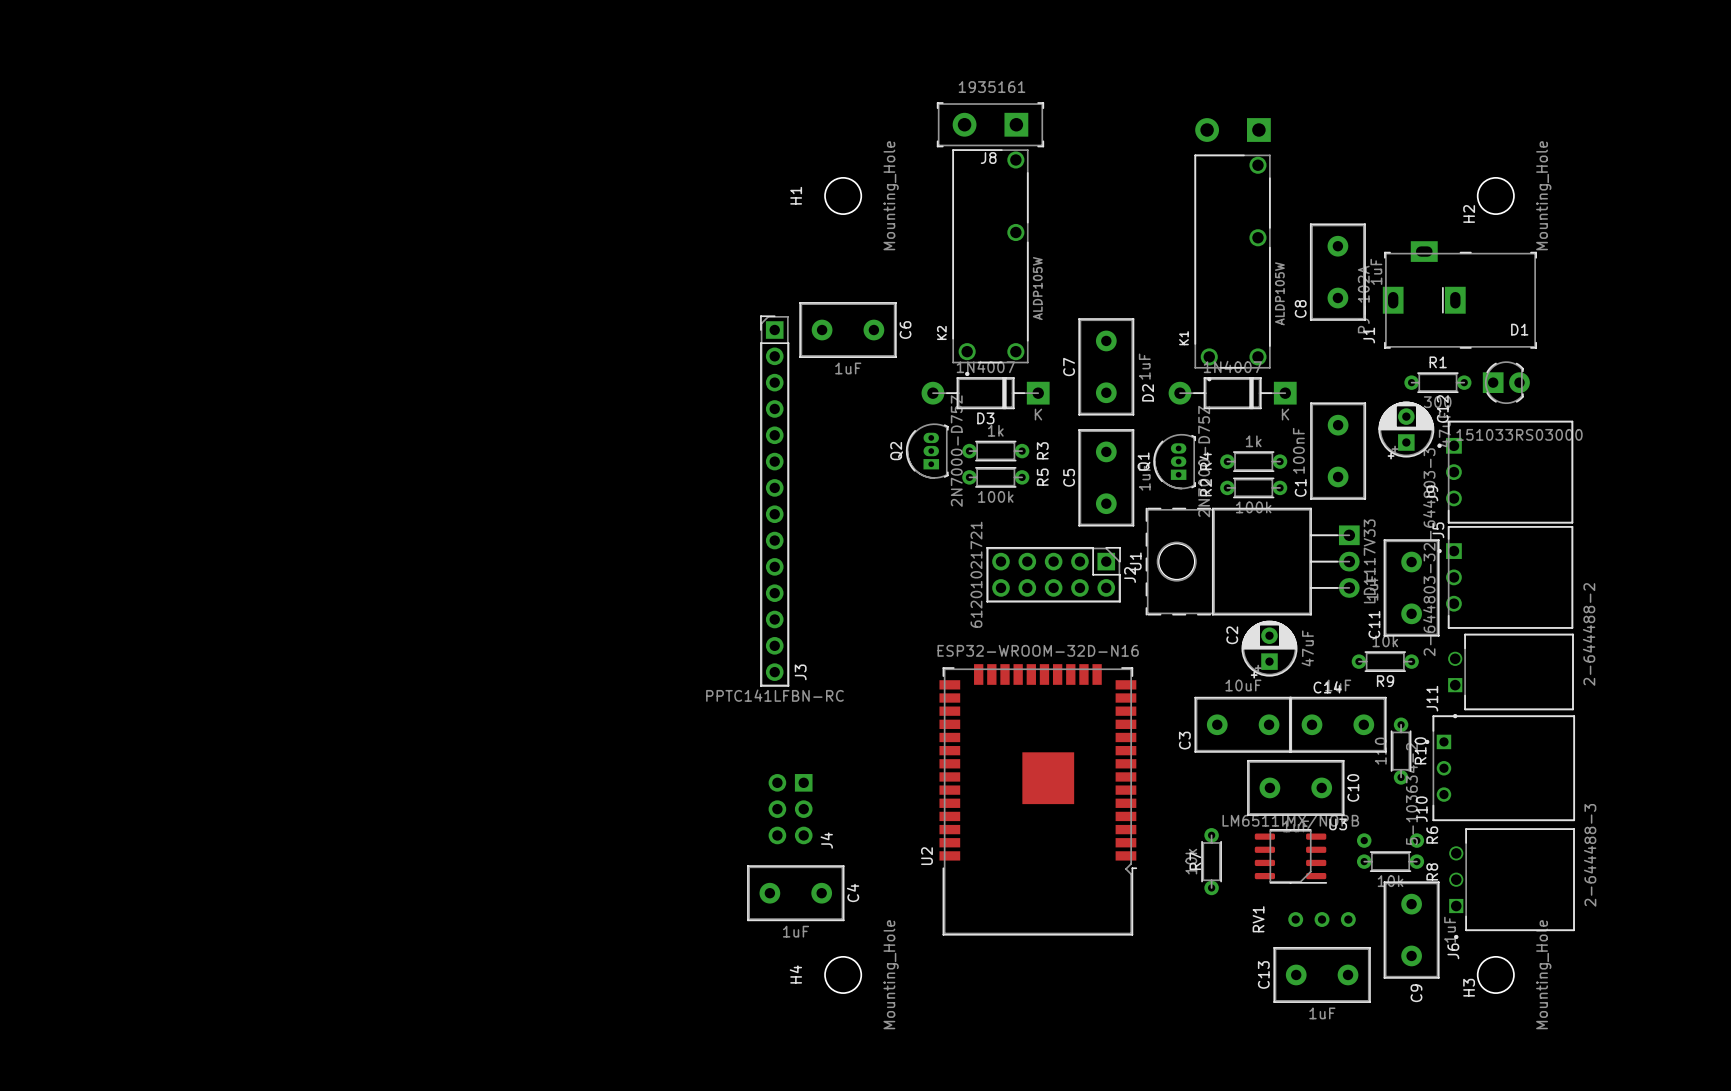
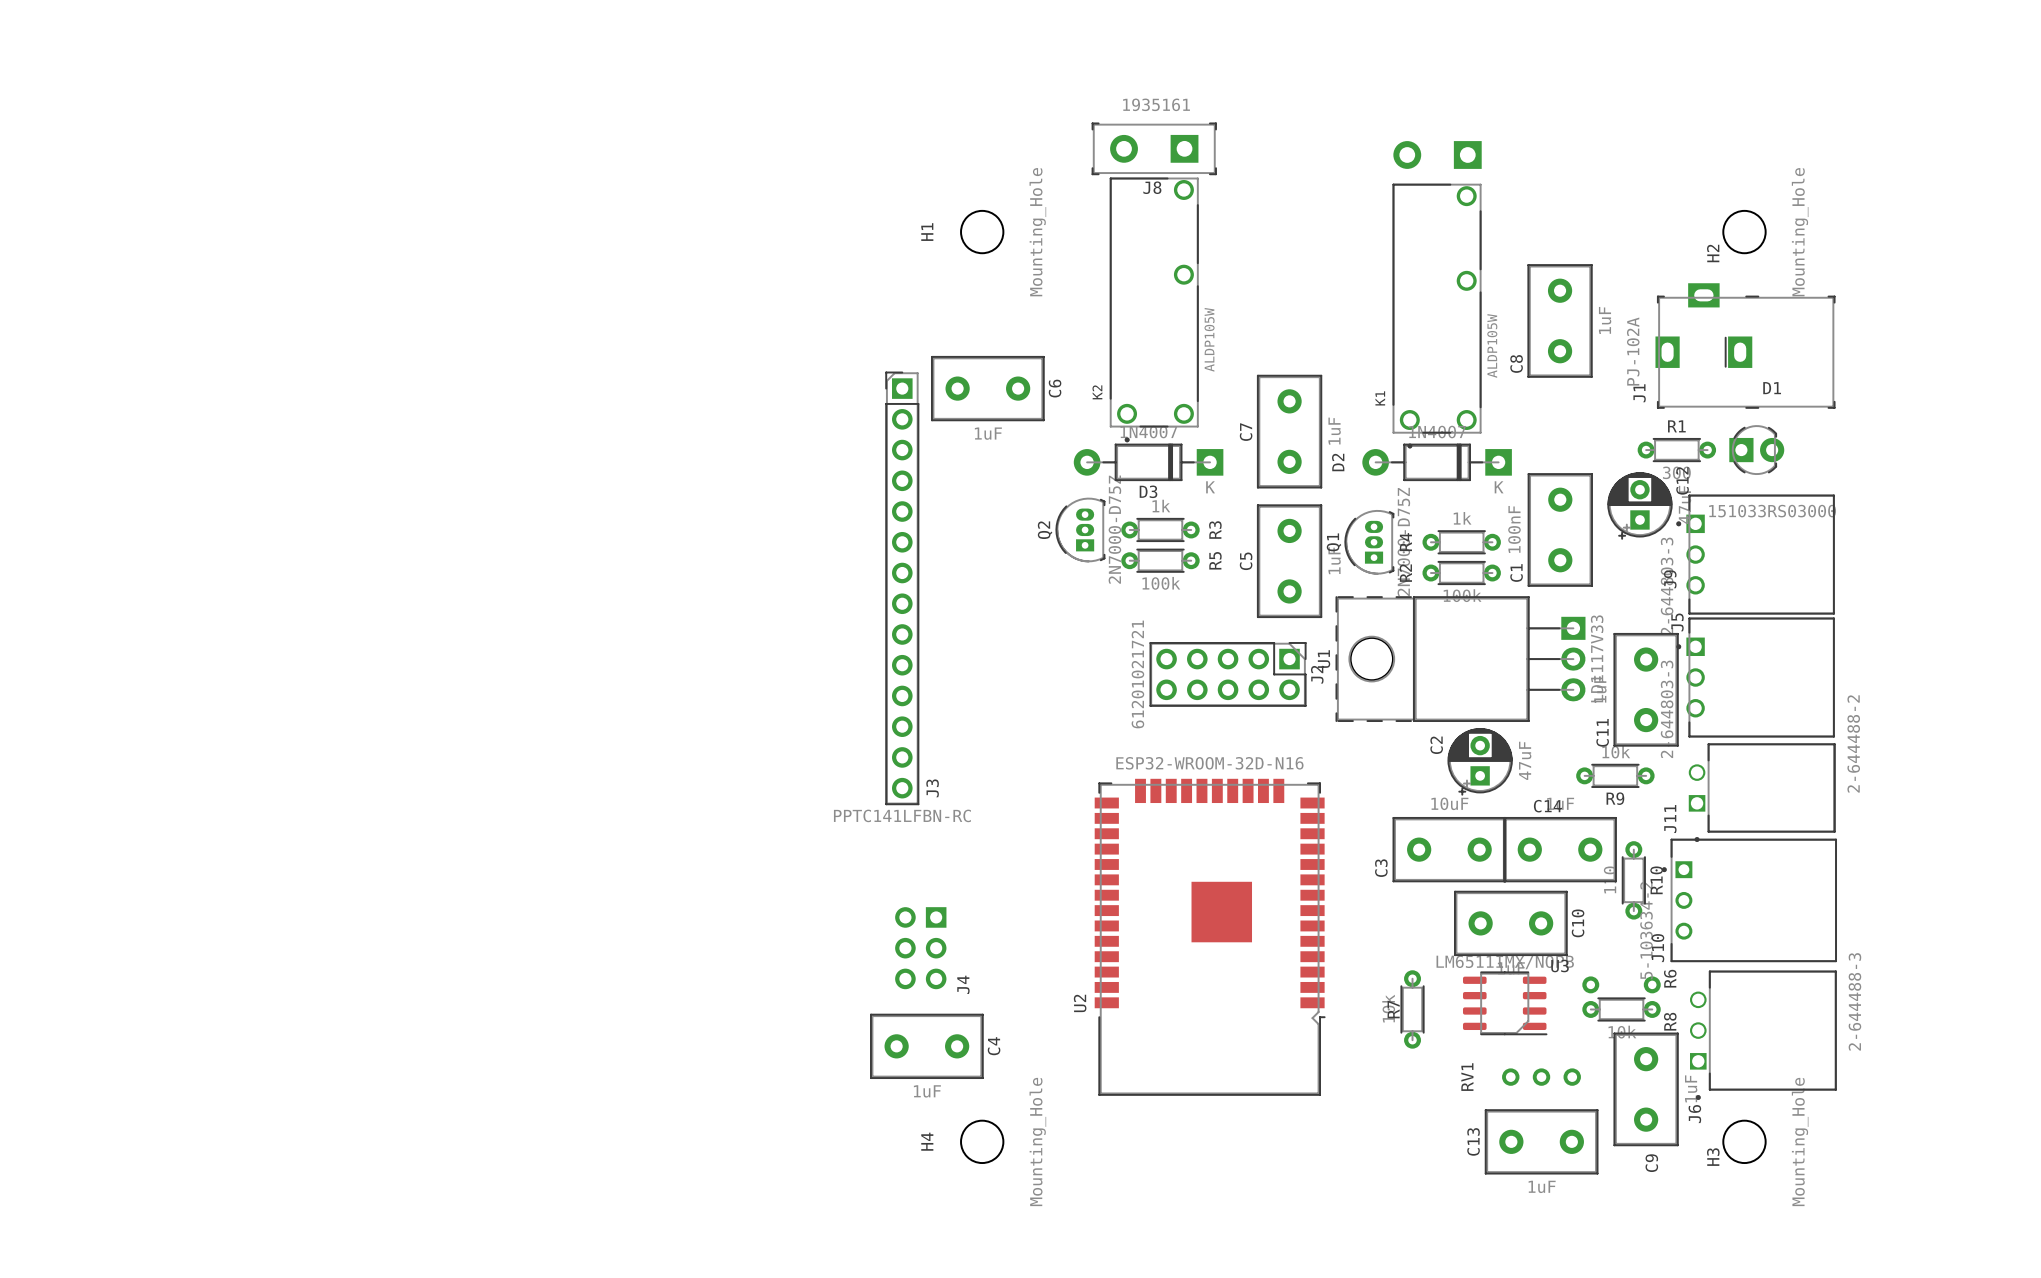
J1 position: (1459, 294) -> (1745, 345)

